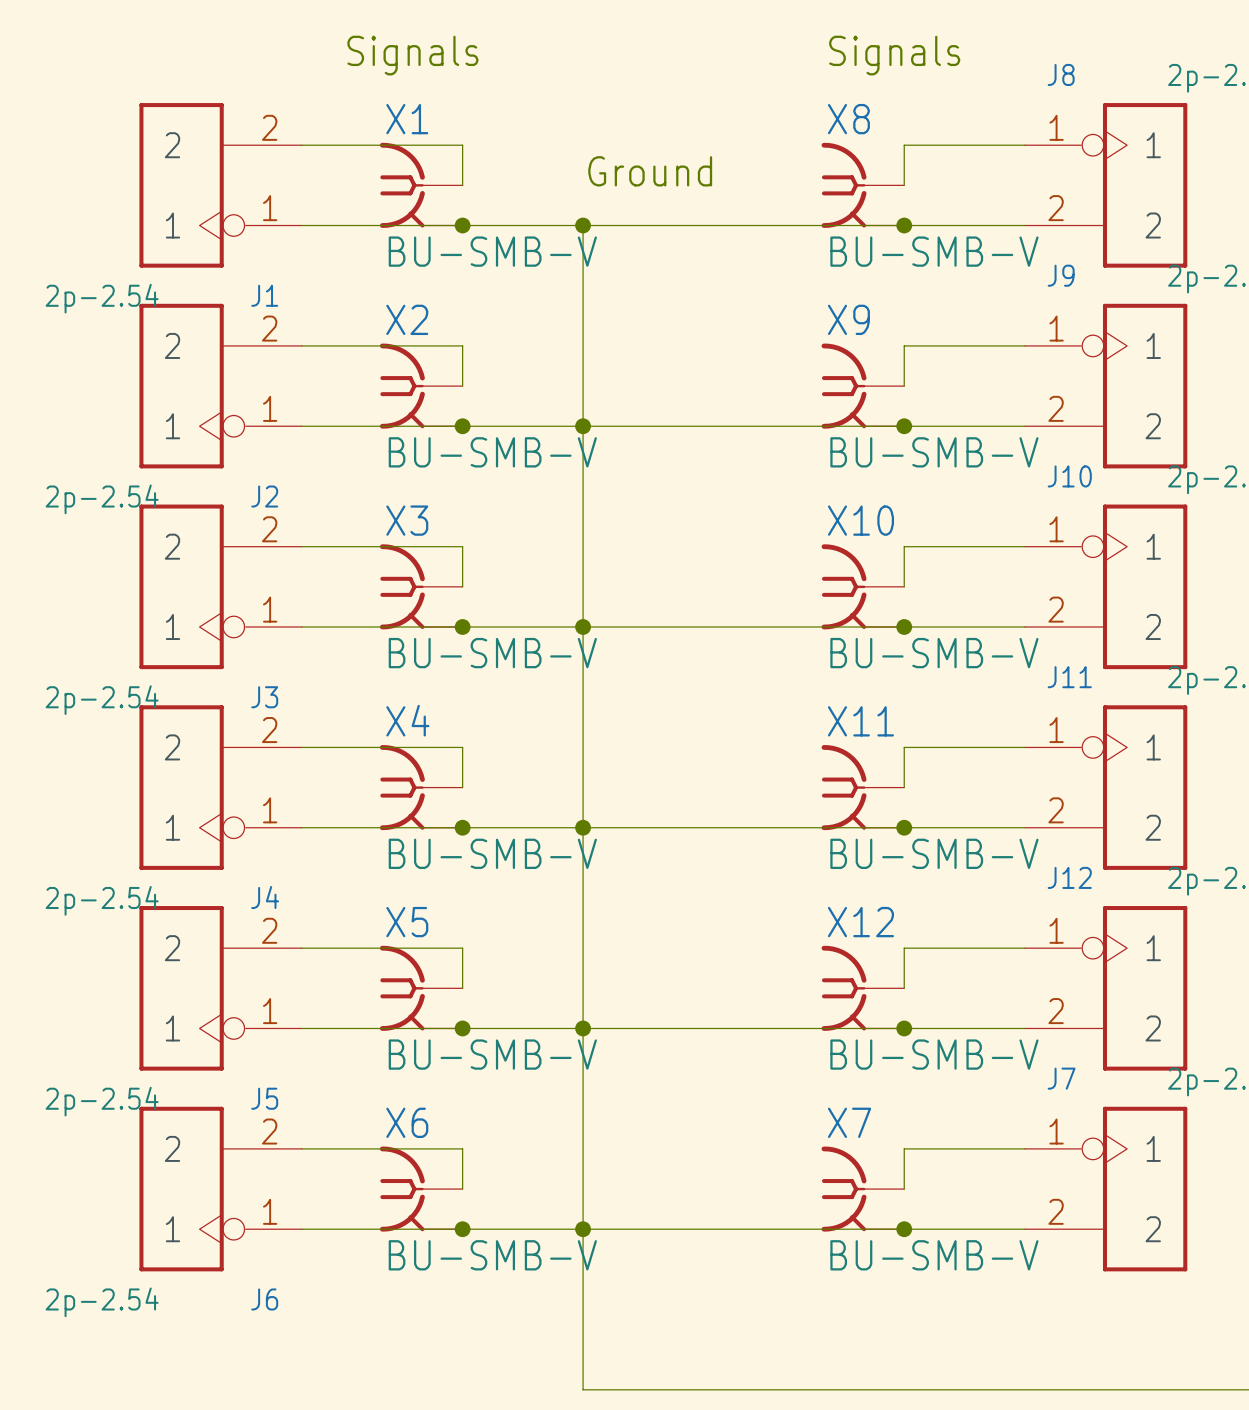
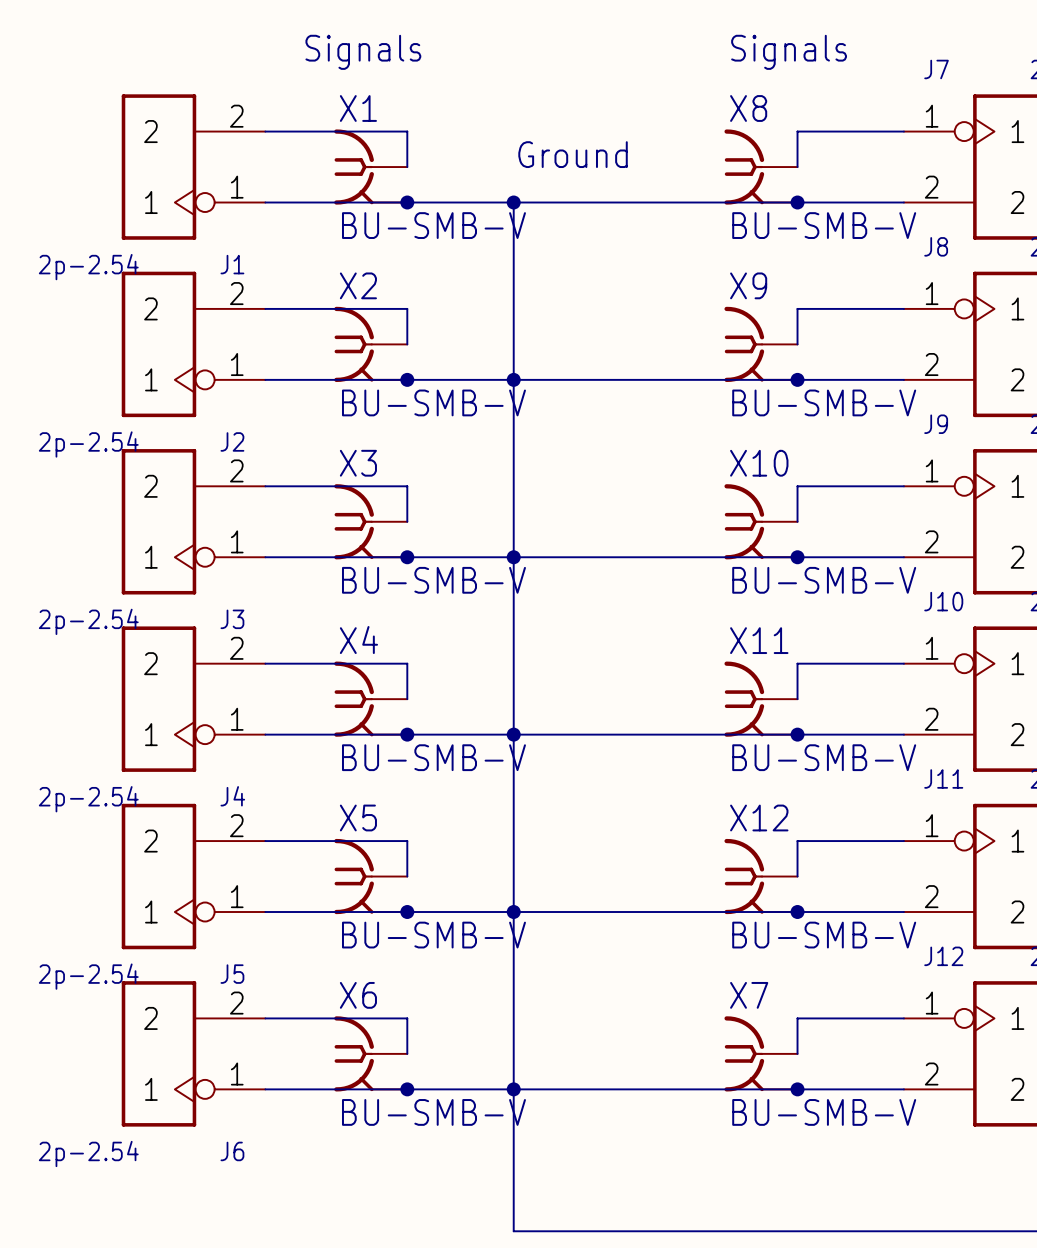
J8 name: J8 (1061, 74) -> J7 (936, 69)
J9 name: J9 (1061, 275) -> J8 (936, 246)
J10 name: J10 (1069, 476) -> J9 (936, 424)
J11 name: J11 (1069, 677) -> J10 (943, 601)
J12 name: J12 (1069, 877) -> J11 (943, 778)
J7 name: J7 (1061, 1078) -> J12 (943, 956)

